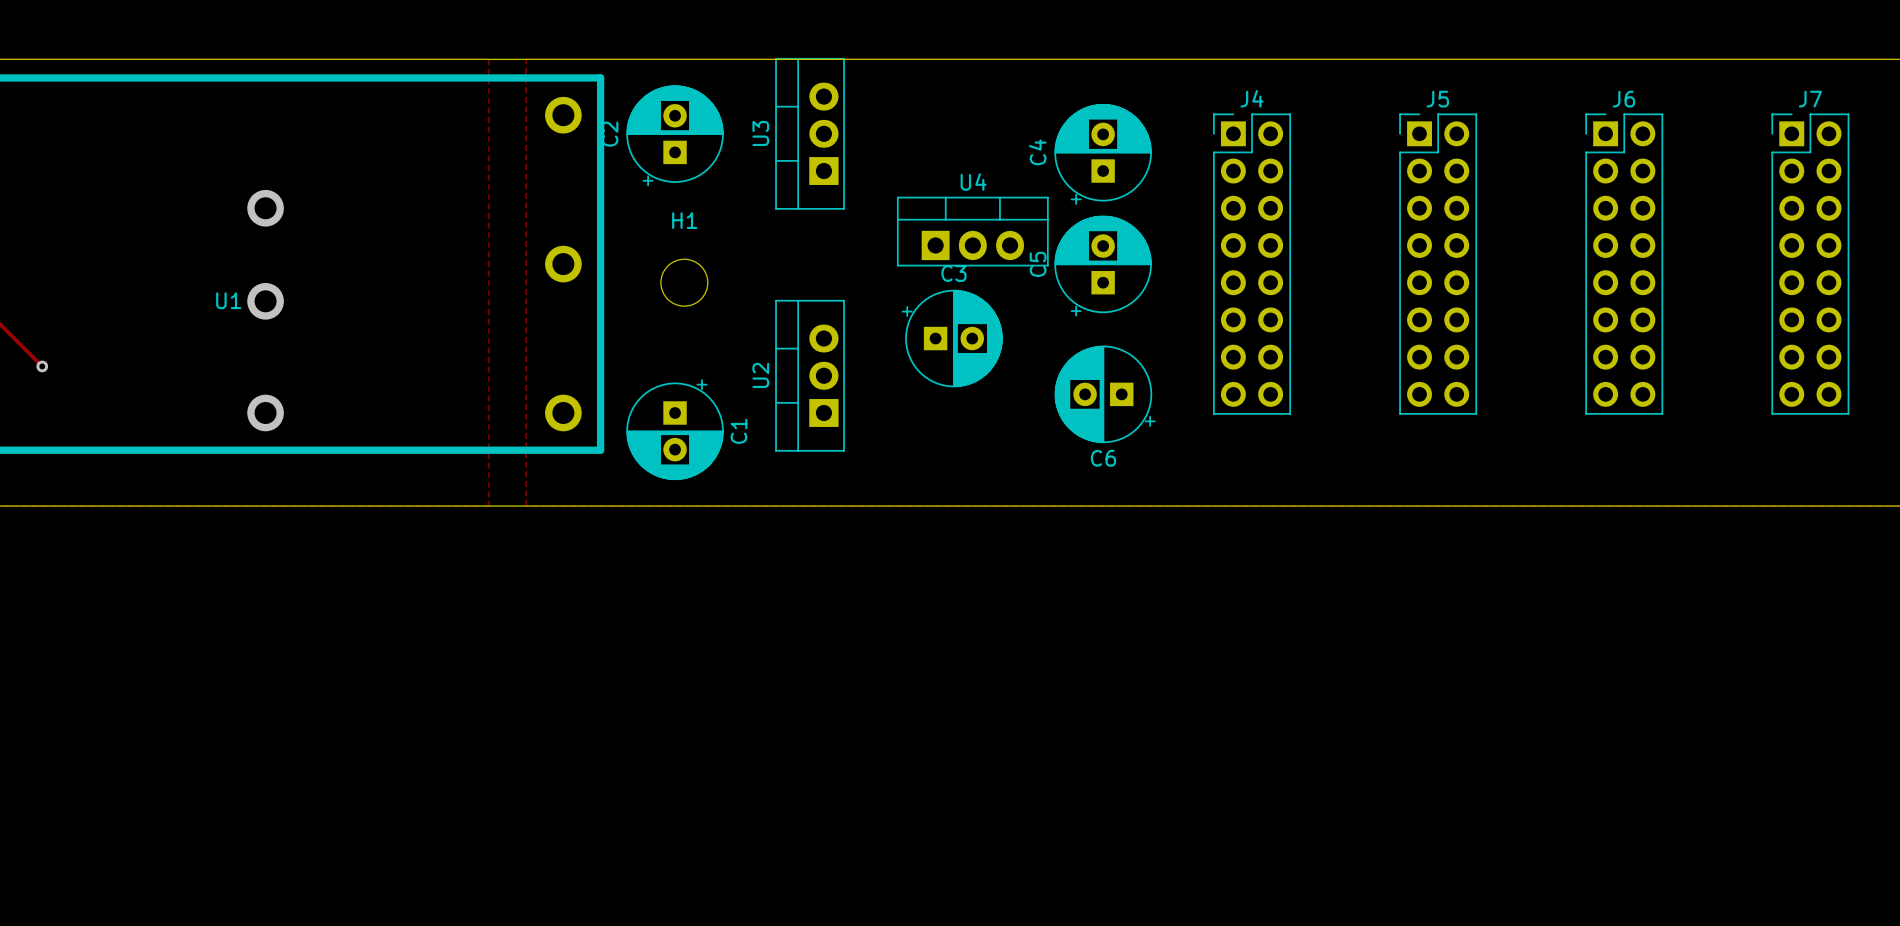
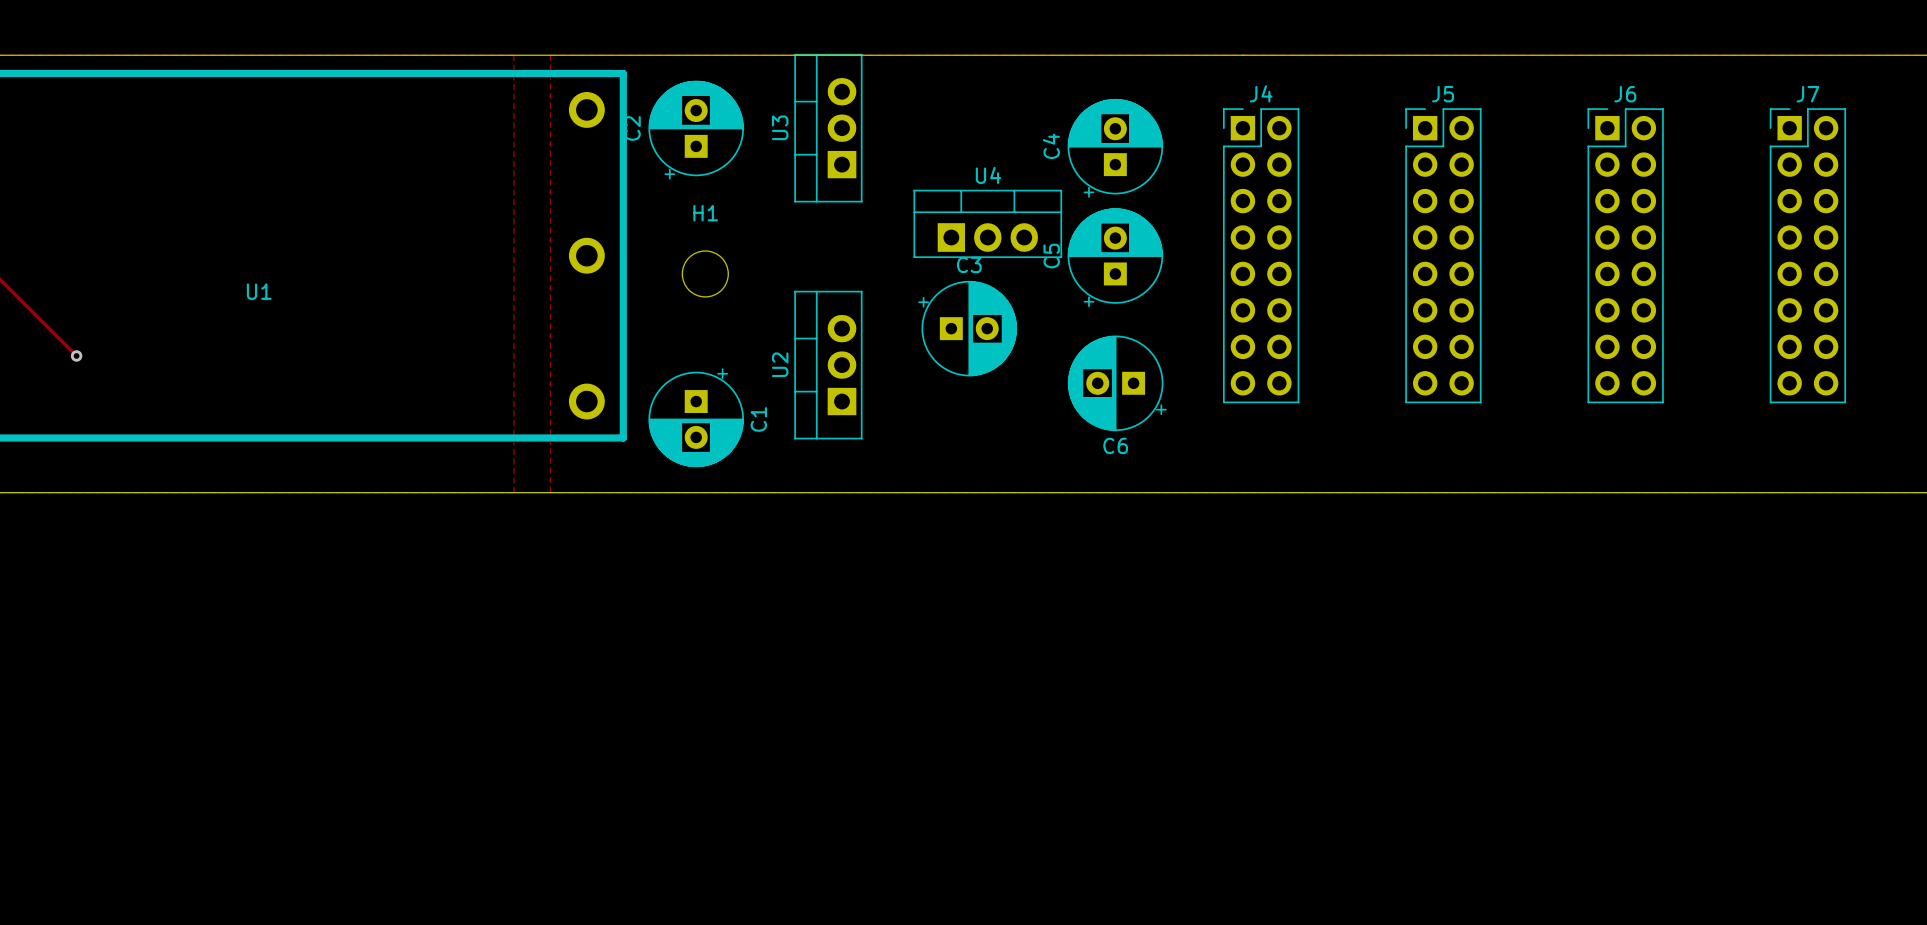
via: (265, 208) -> none
via: (265, 301) -> none
via: (265, 412) -> none

